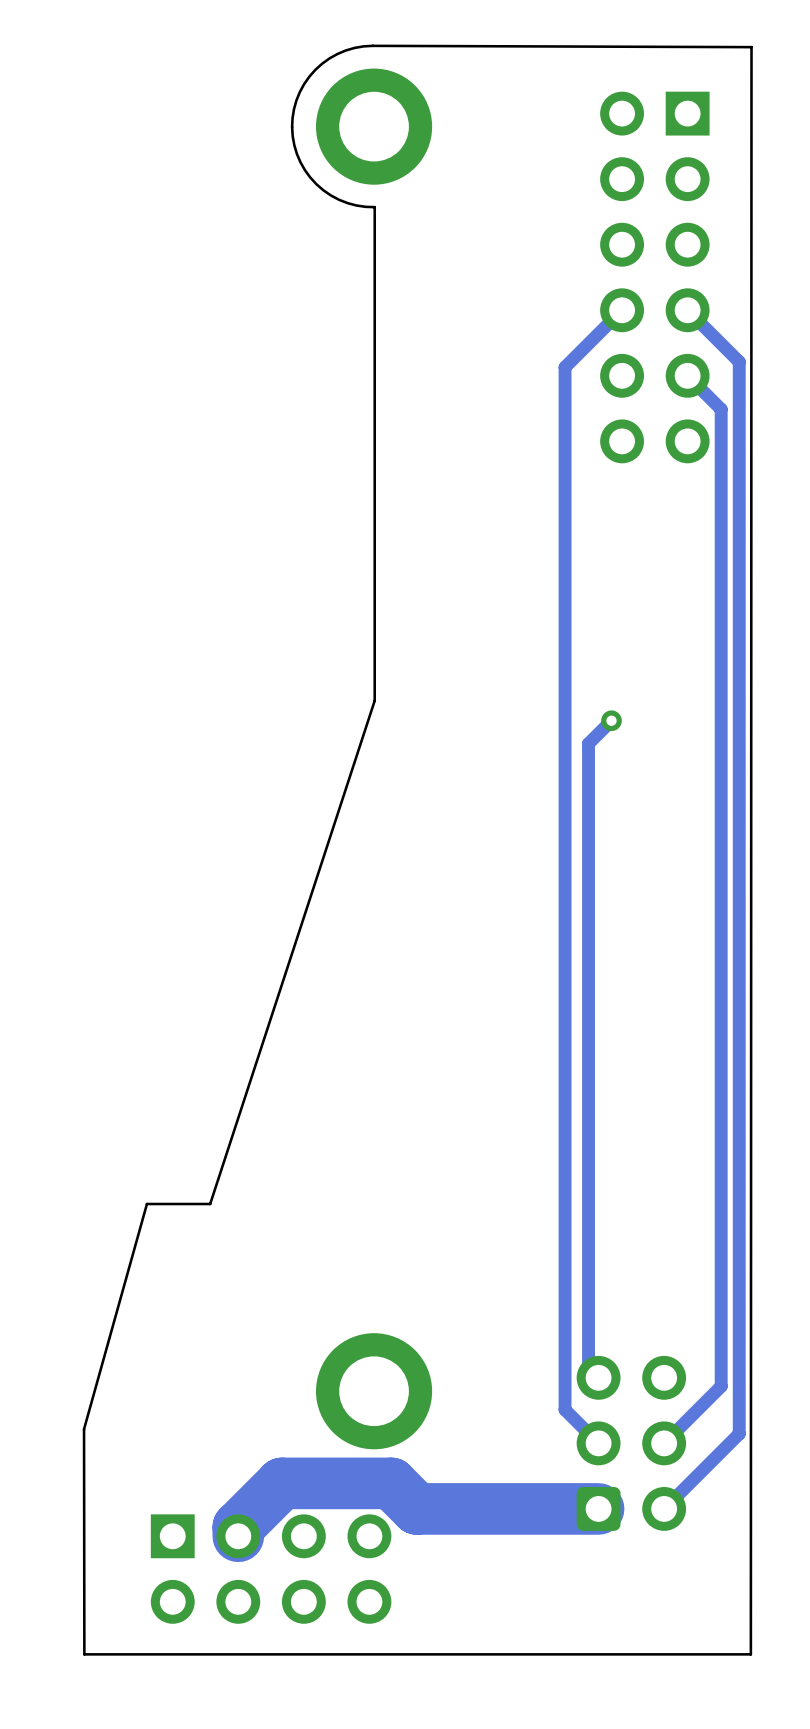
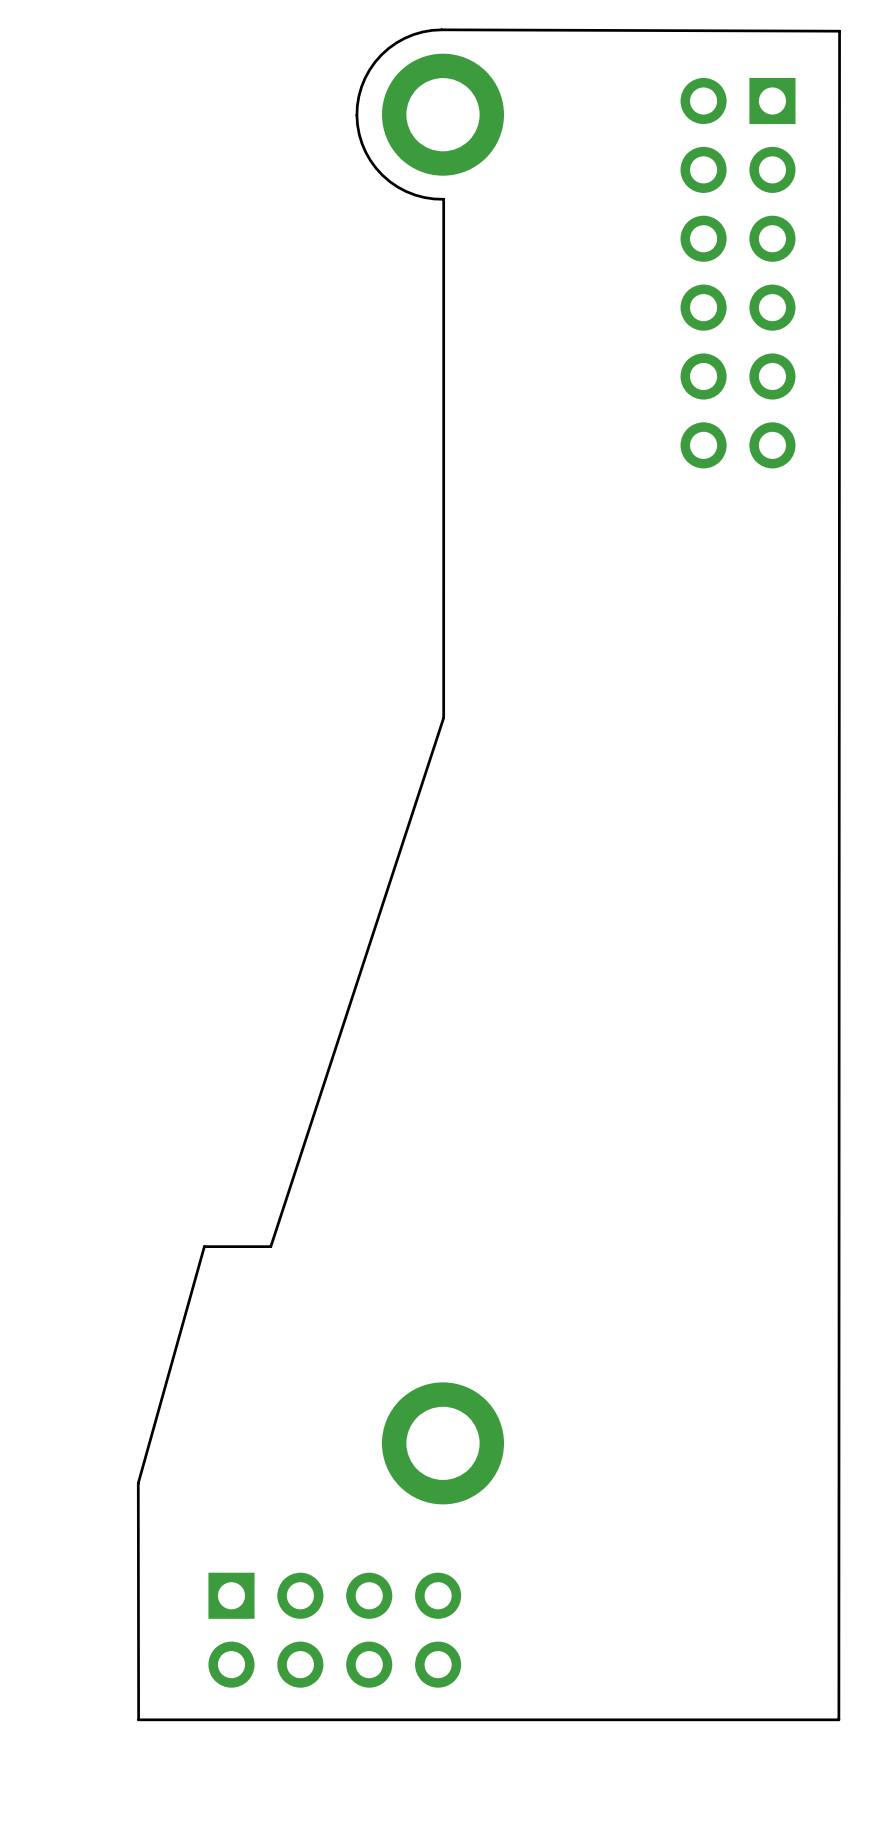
track: (622, 310) (565, 367) (565, 1409) (598, 1443) -> none
track: (687, 310) (739, 361) (739, 1433) (664, 1508) -> none
track: (687, 375) (721, 409) (721, 1386) (664, 1443) -> none
track: (611, 720) (588, 743) (588, 1367) (598, 1377) -> none
via: (611, 720) -> none
part: (631, 1443) -> none
track: (598, 1508) (416, 1508) (391, 1483) (281, 1483) (238, 1527) (238, 1536) -> none

